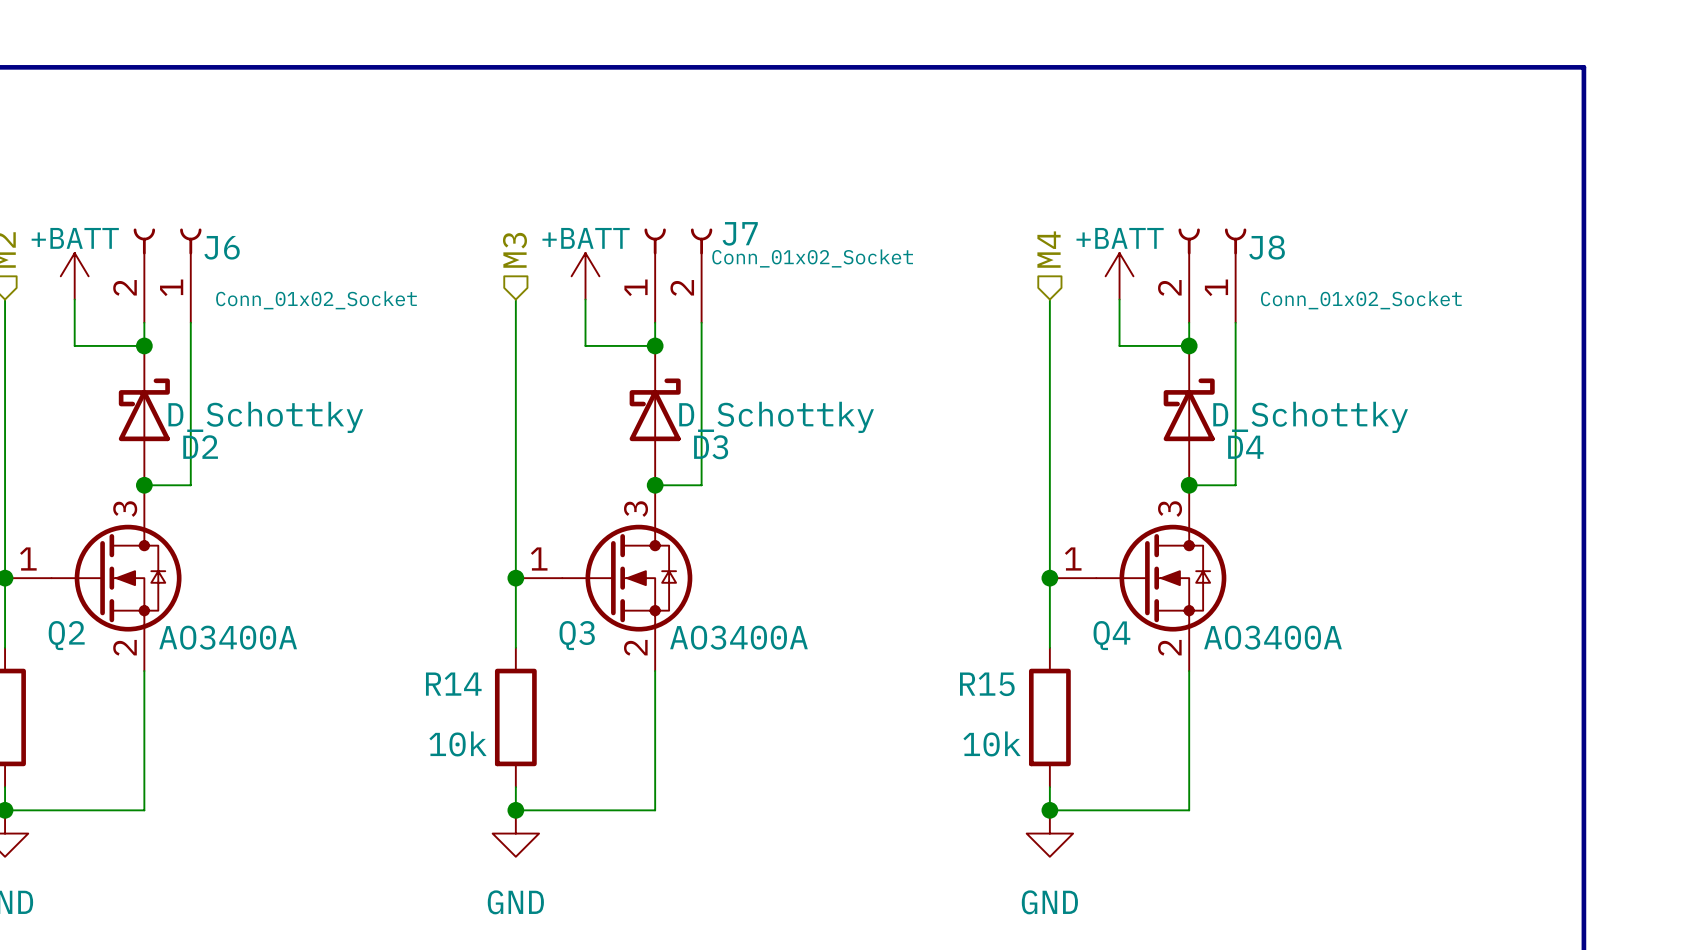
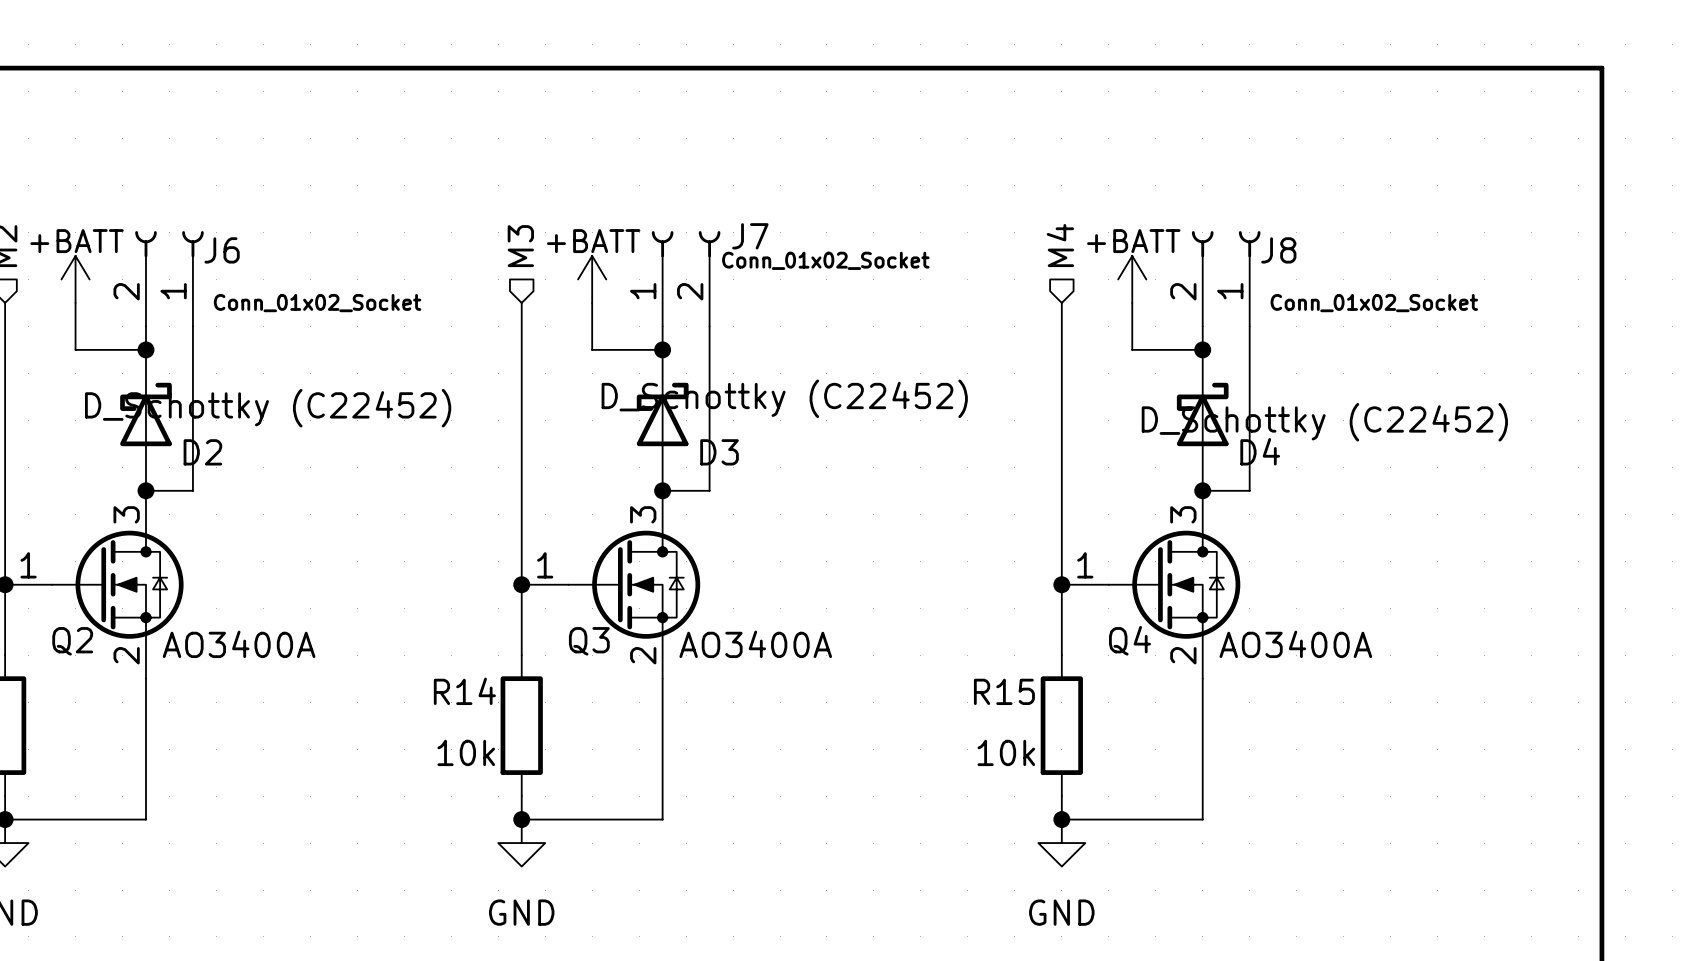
D2 value: D_Schottky (265, 417) -> D_Schottky (C22452) (268, 408)
D3 value: D_Schottky (776, 417) -> D_Schottky (C22452) (784, 398)
D4 value: D_Schottky (1310, 417) -> D_Schottky (C22452) (1324, 422)

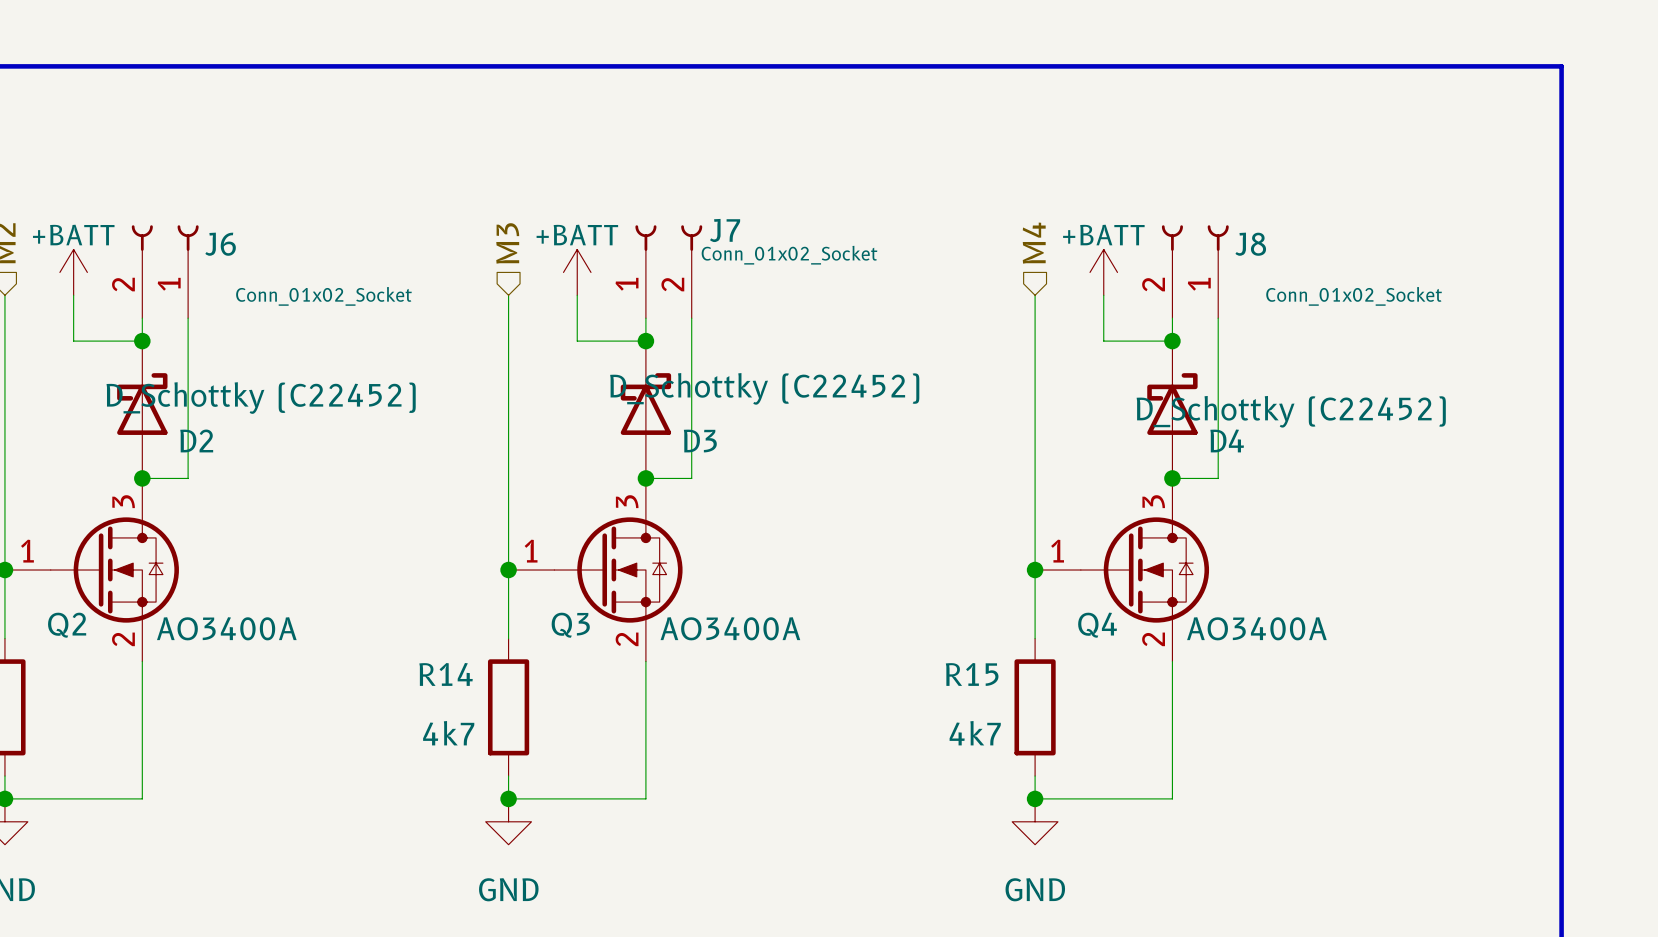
R14 value: 10k (466, 752) -> 4k7 (448, 733)
R15 value: 10k (1006, 752) -> 4k7 (975, 733)

